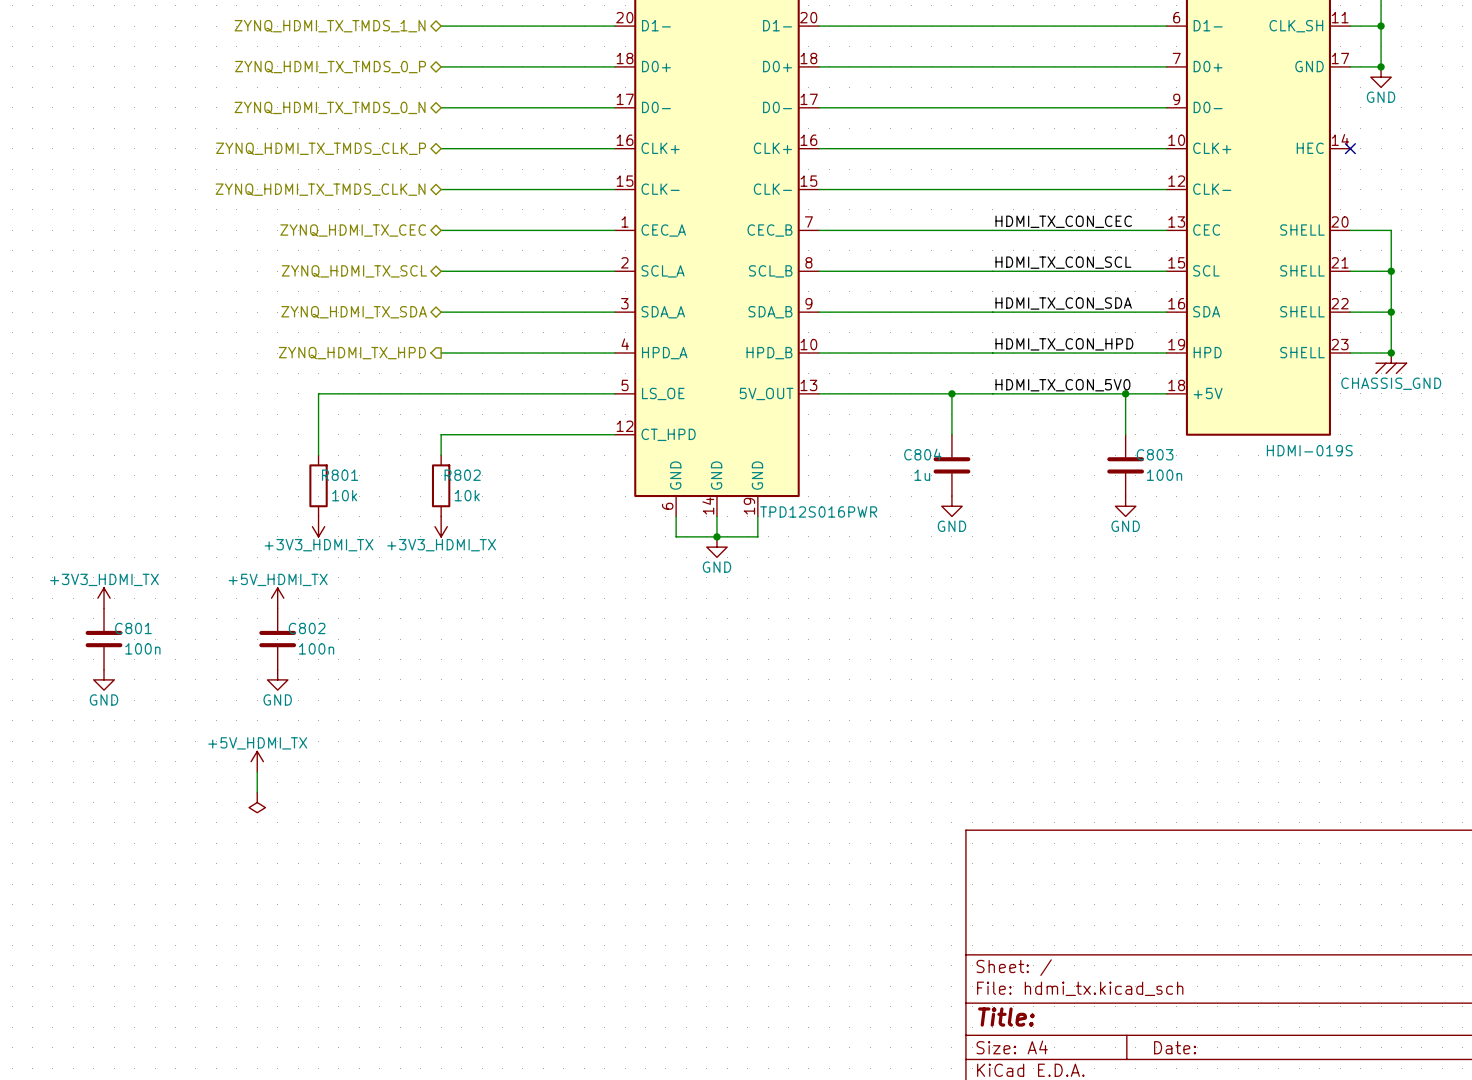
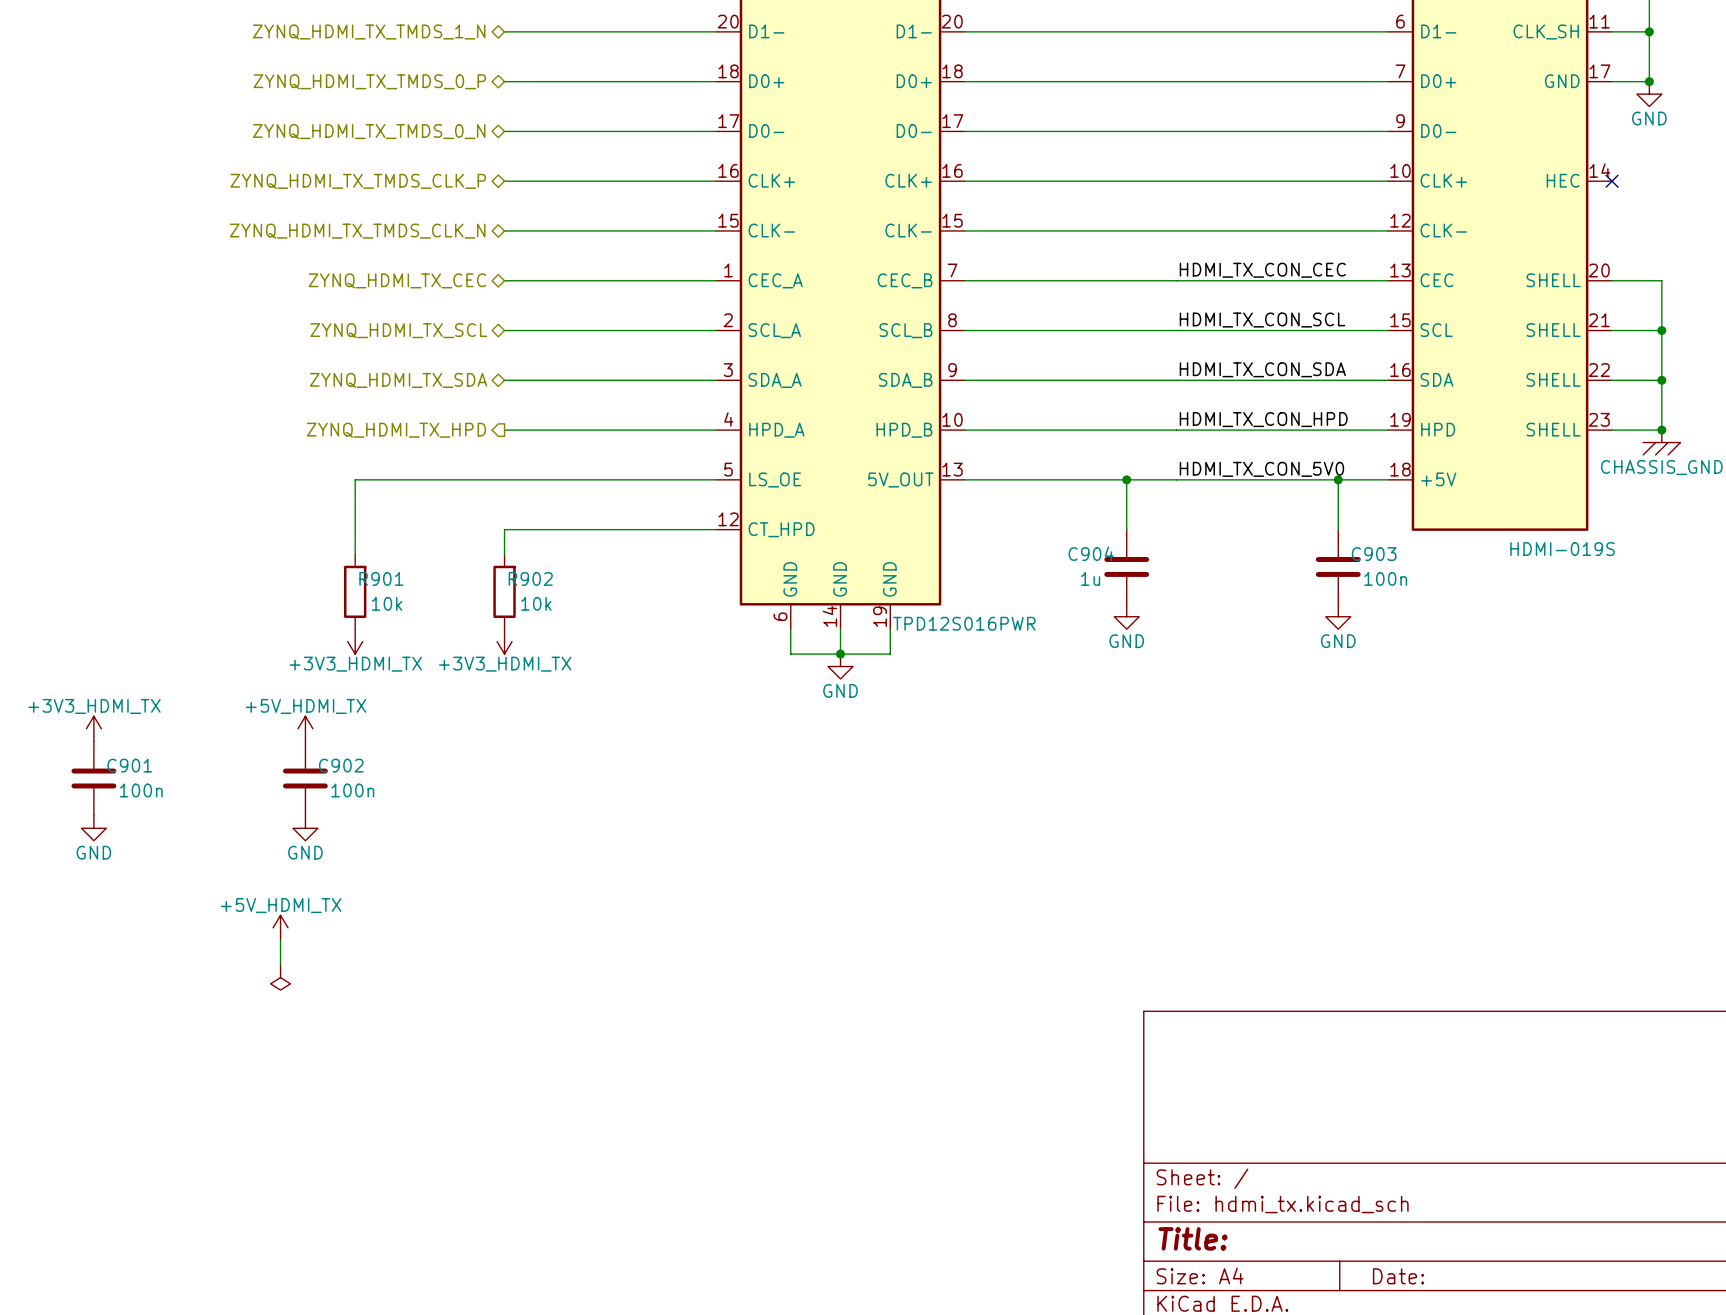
C804 name: C804 (922, 454) -> C904 (1091, 553)
C803 name: C803 (1155, 454) -> C903 (1374, 554)
R801 name: R801 (340, 475) -> R901 (381, 578)
R802 name: R802 (462, 475) -> R902 (530, 578)
C801 name: C801 (133, 628) -> C901 (129, 765)
C802 name: C802 (307, 628) -> C902 (341, 765)

